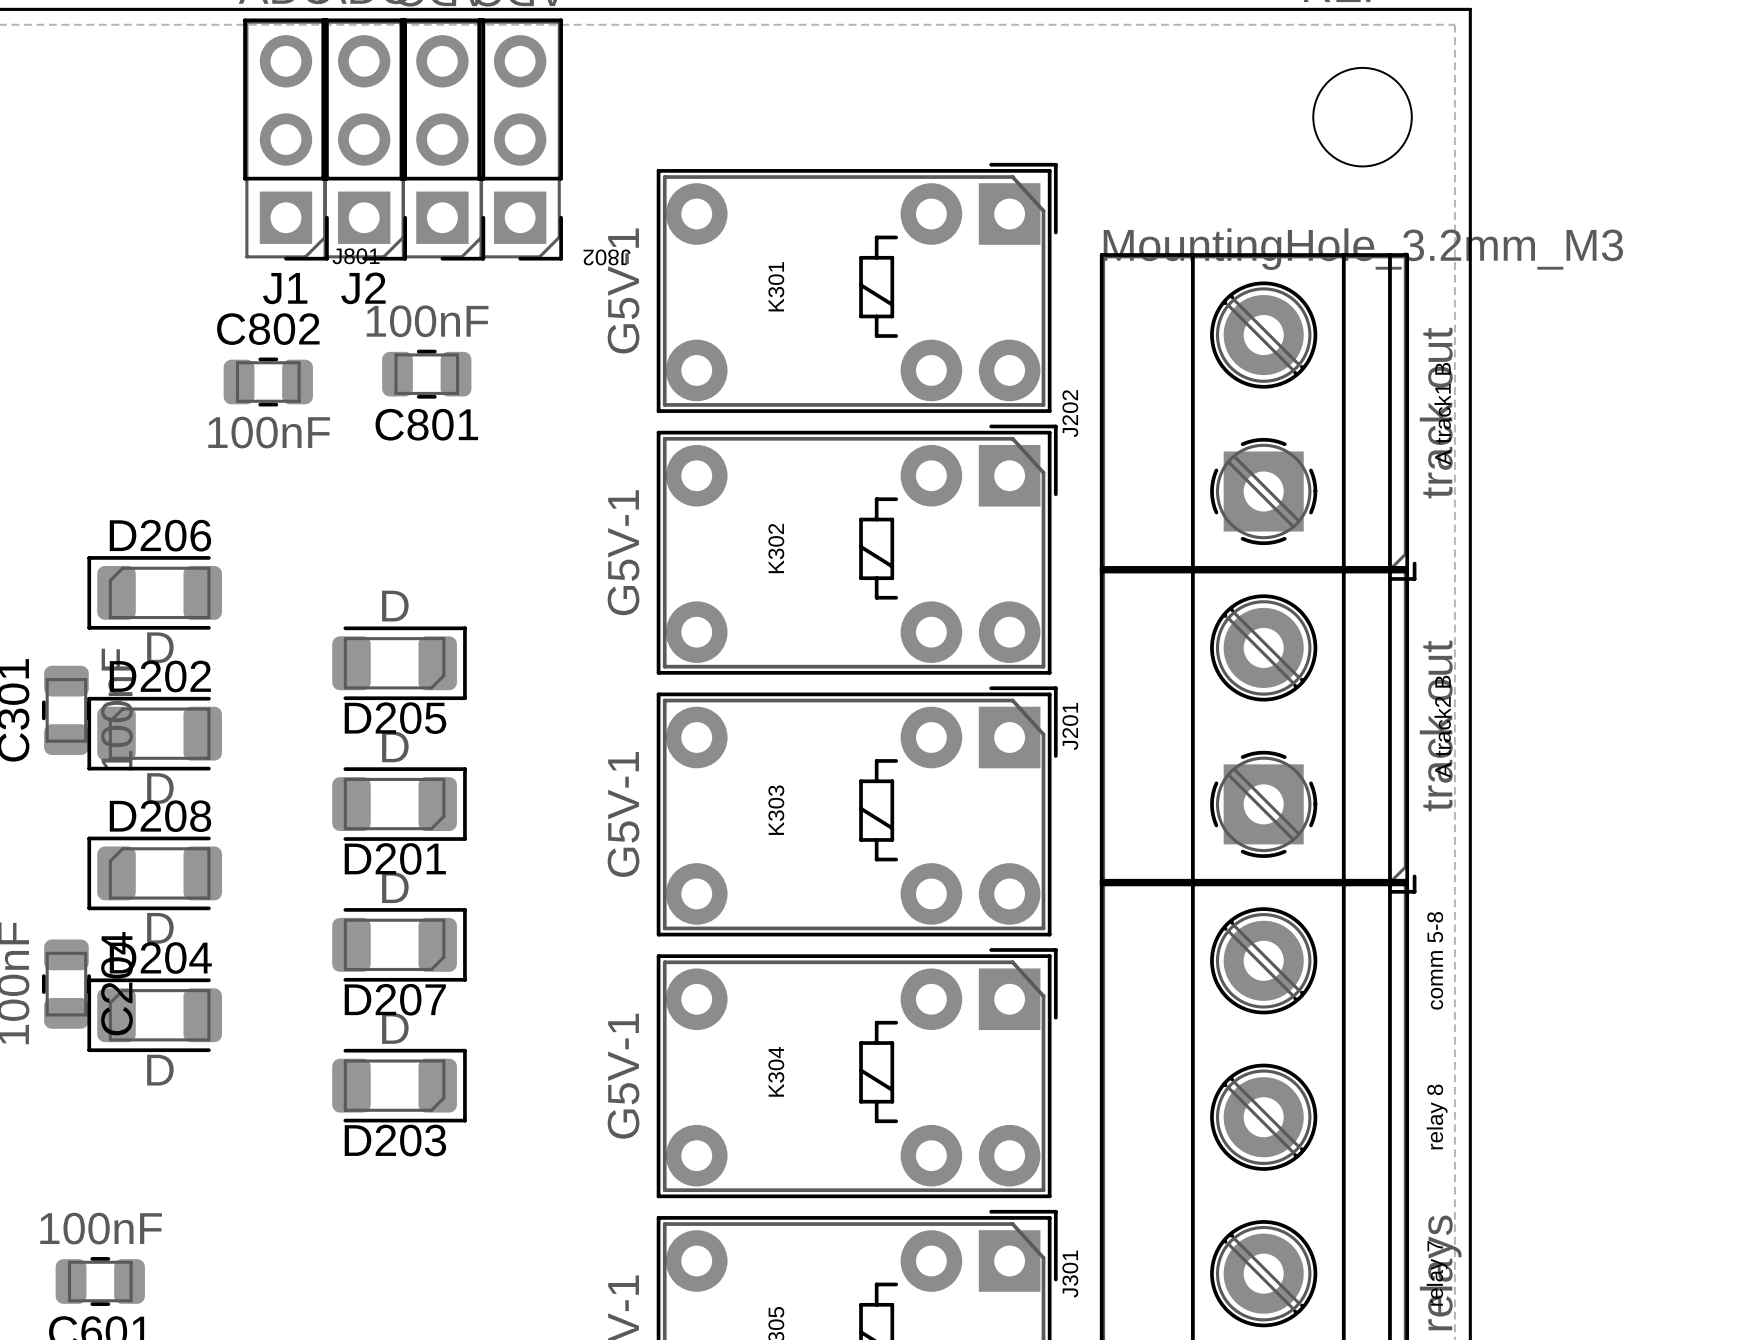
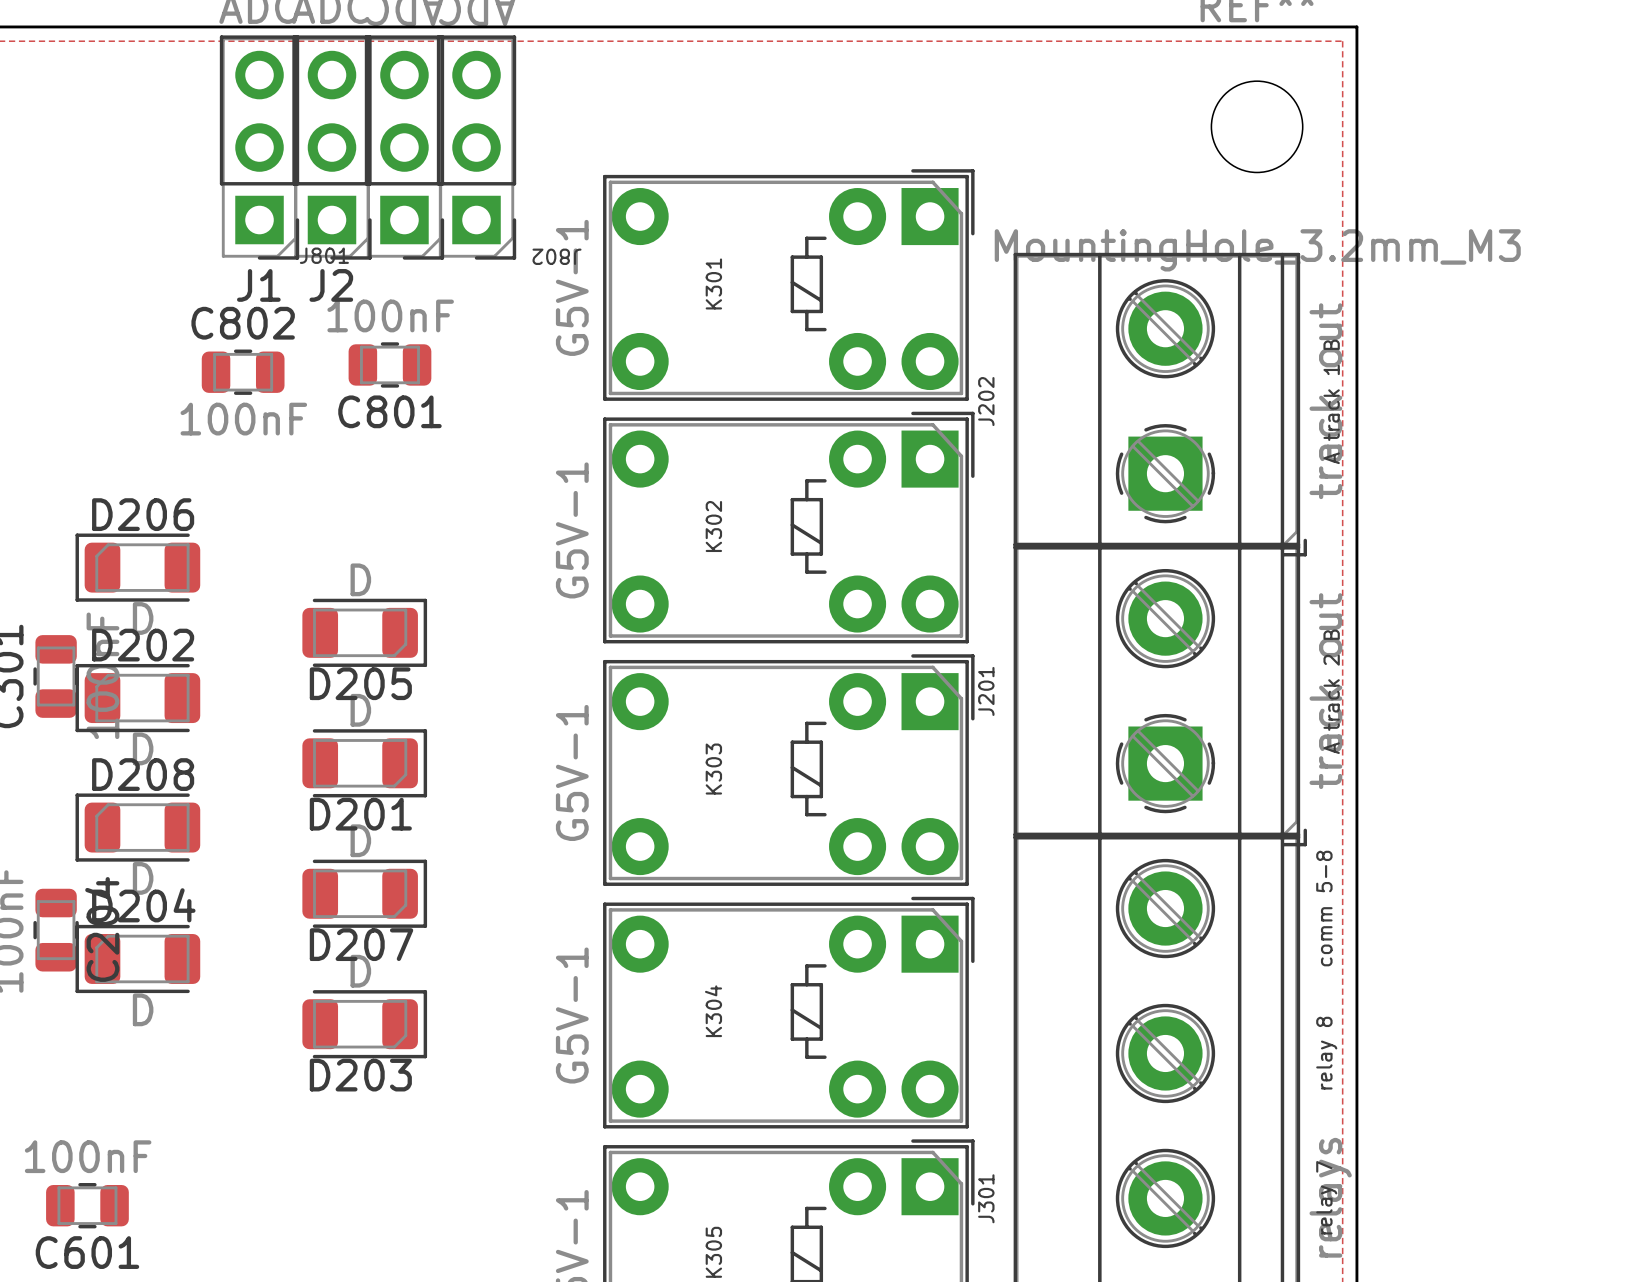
text: A track1 B (1442, 413) -> A track 1 B (1331, 401)
text: A track2 B (1442, 726) -> A track 2 B (1331, 691)

